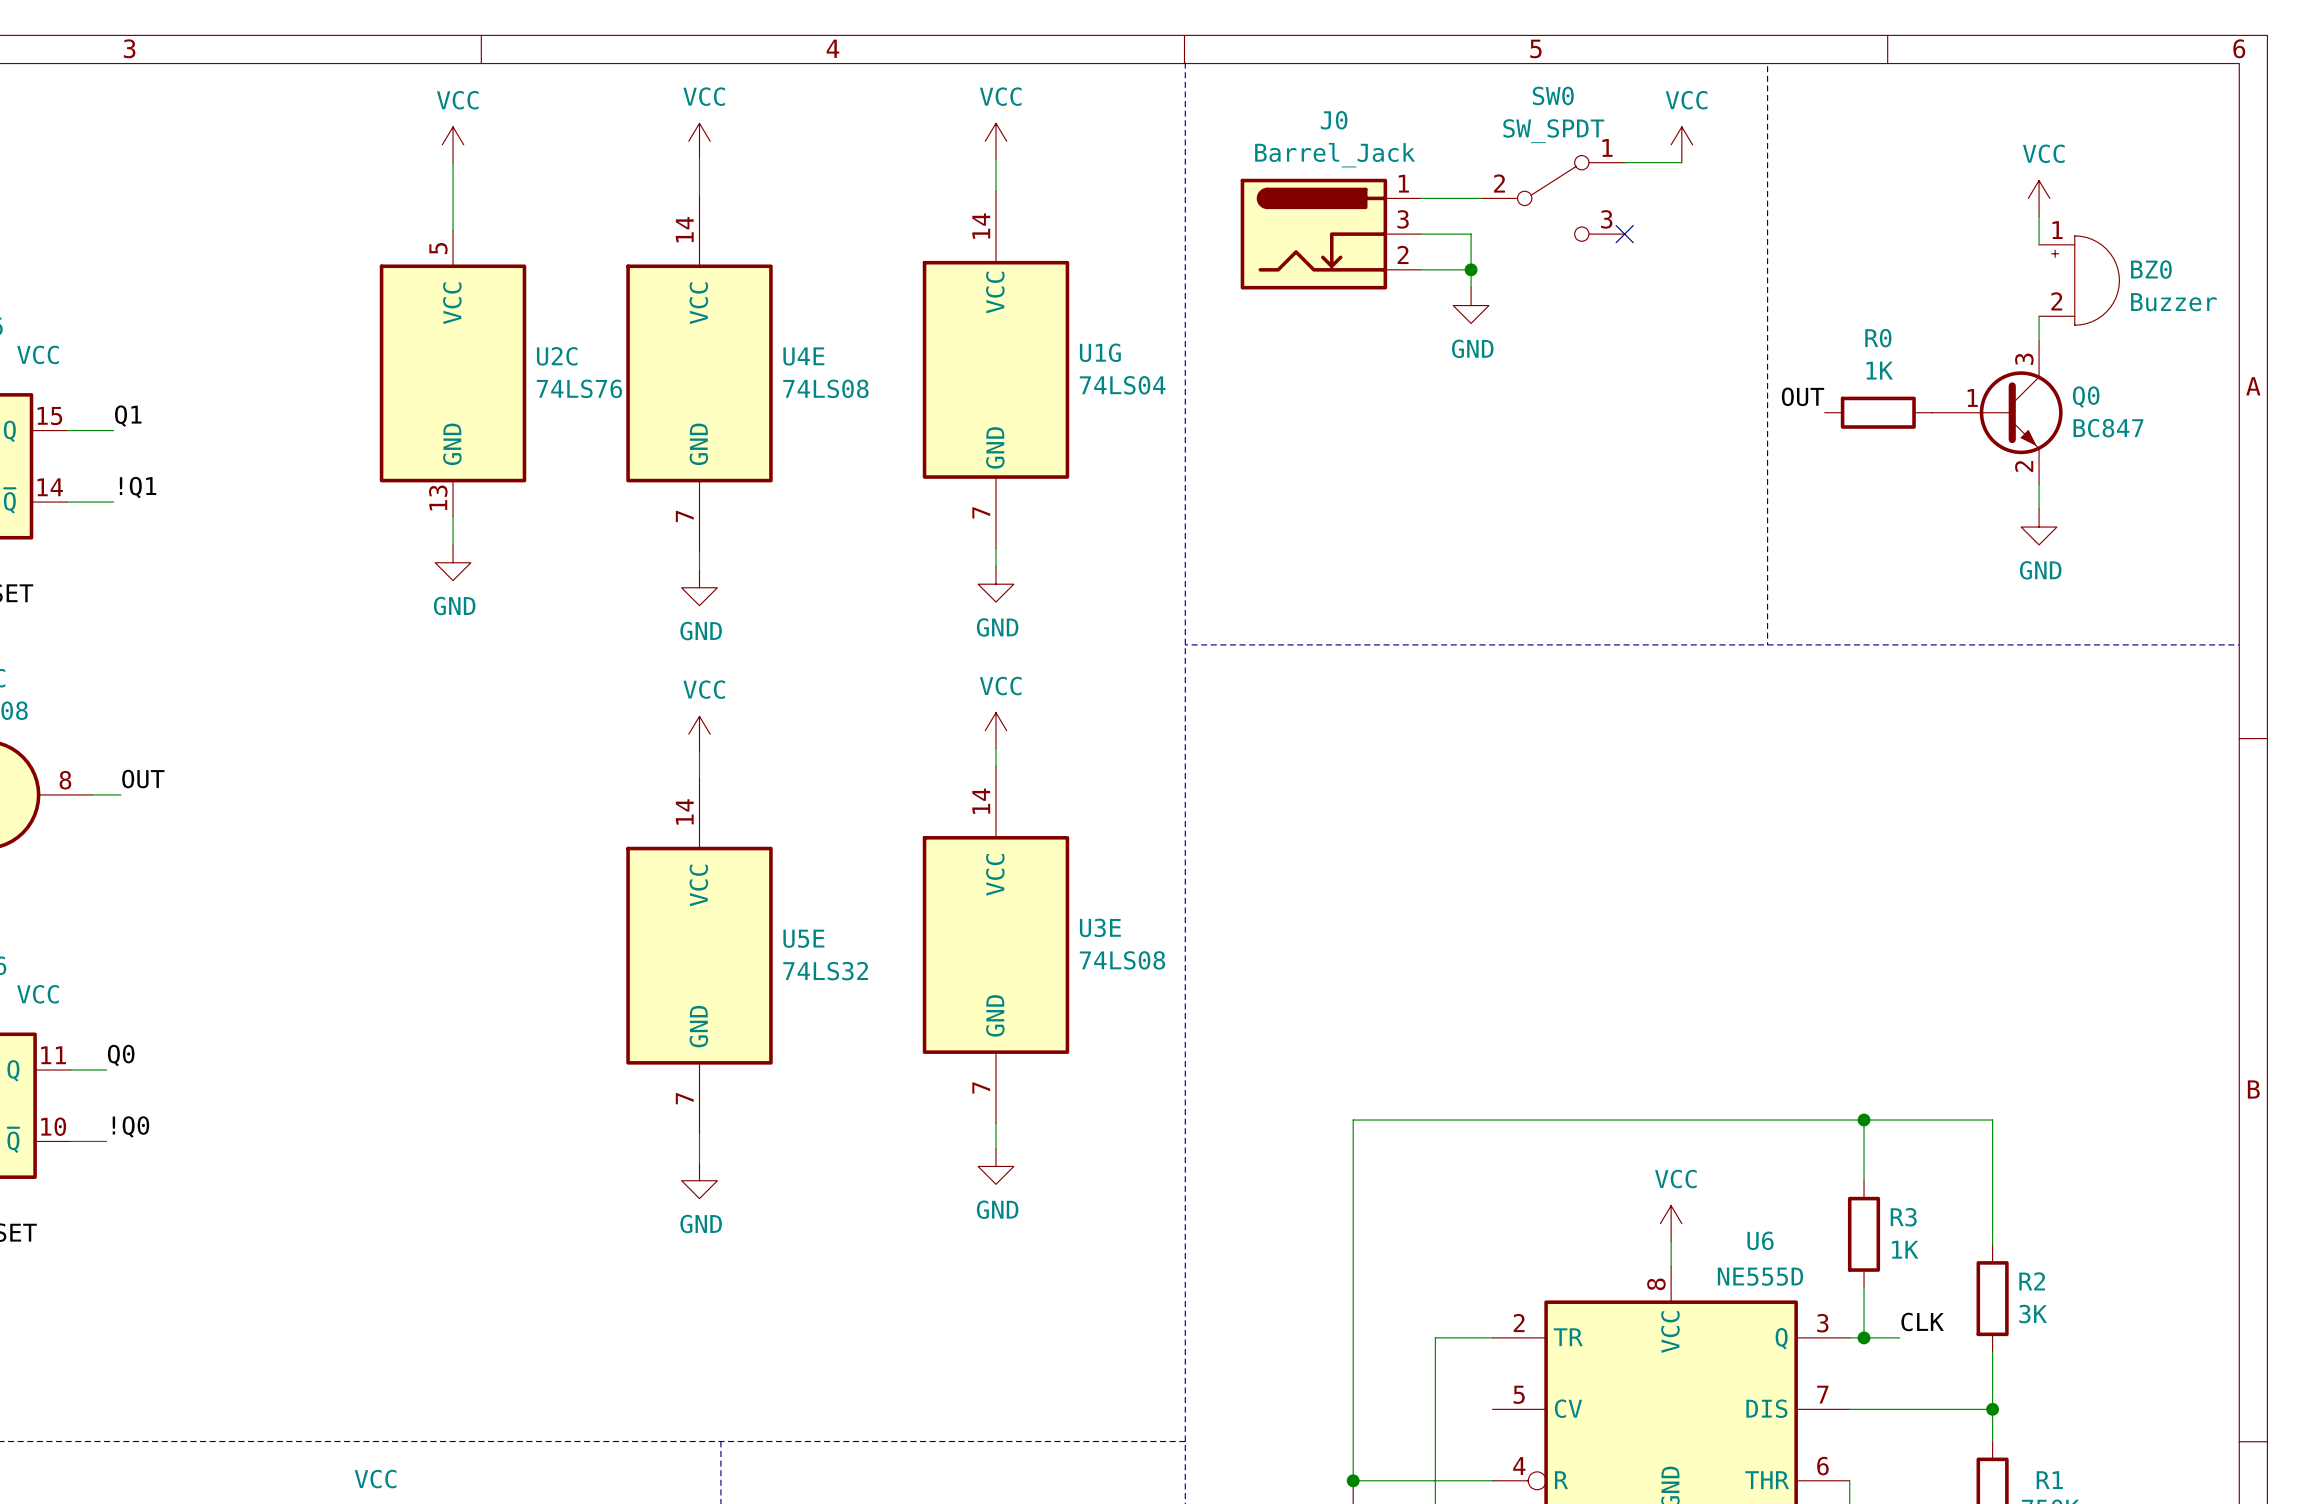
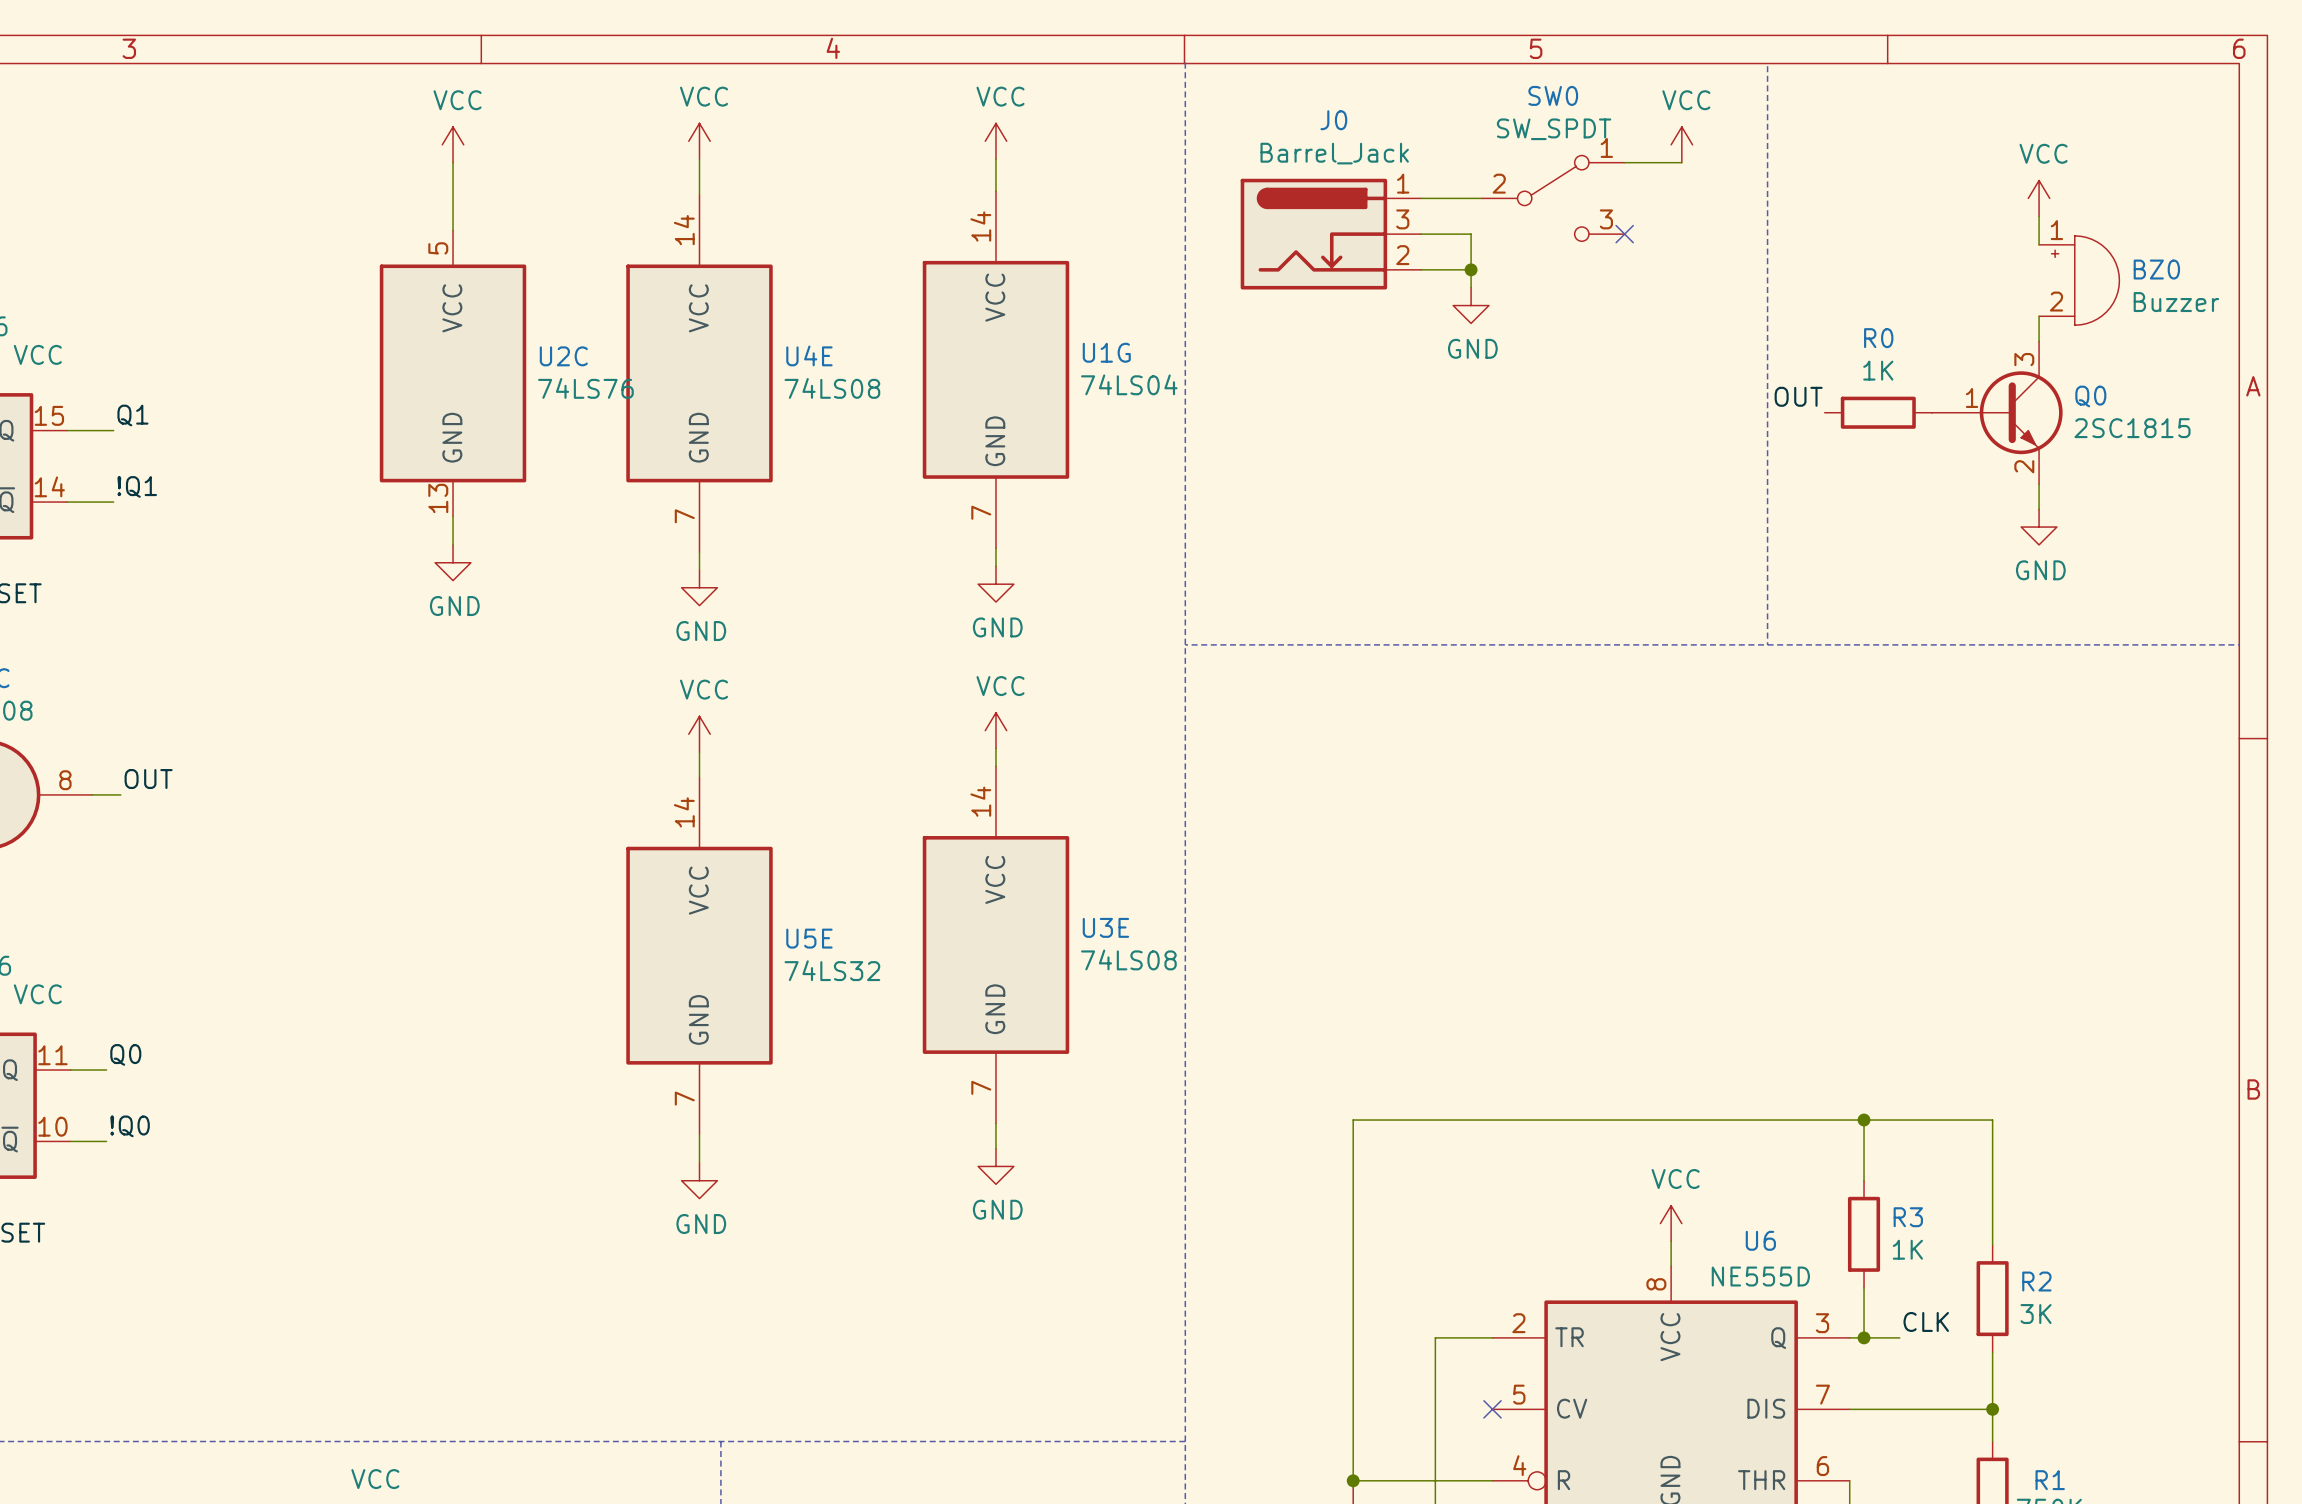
Q0 value: BC847 (2108, 428) -> 2SC1815 (2132, 428)
no-connect mark: none -> (1492, 1409)

